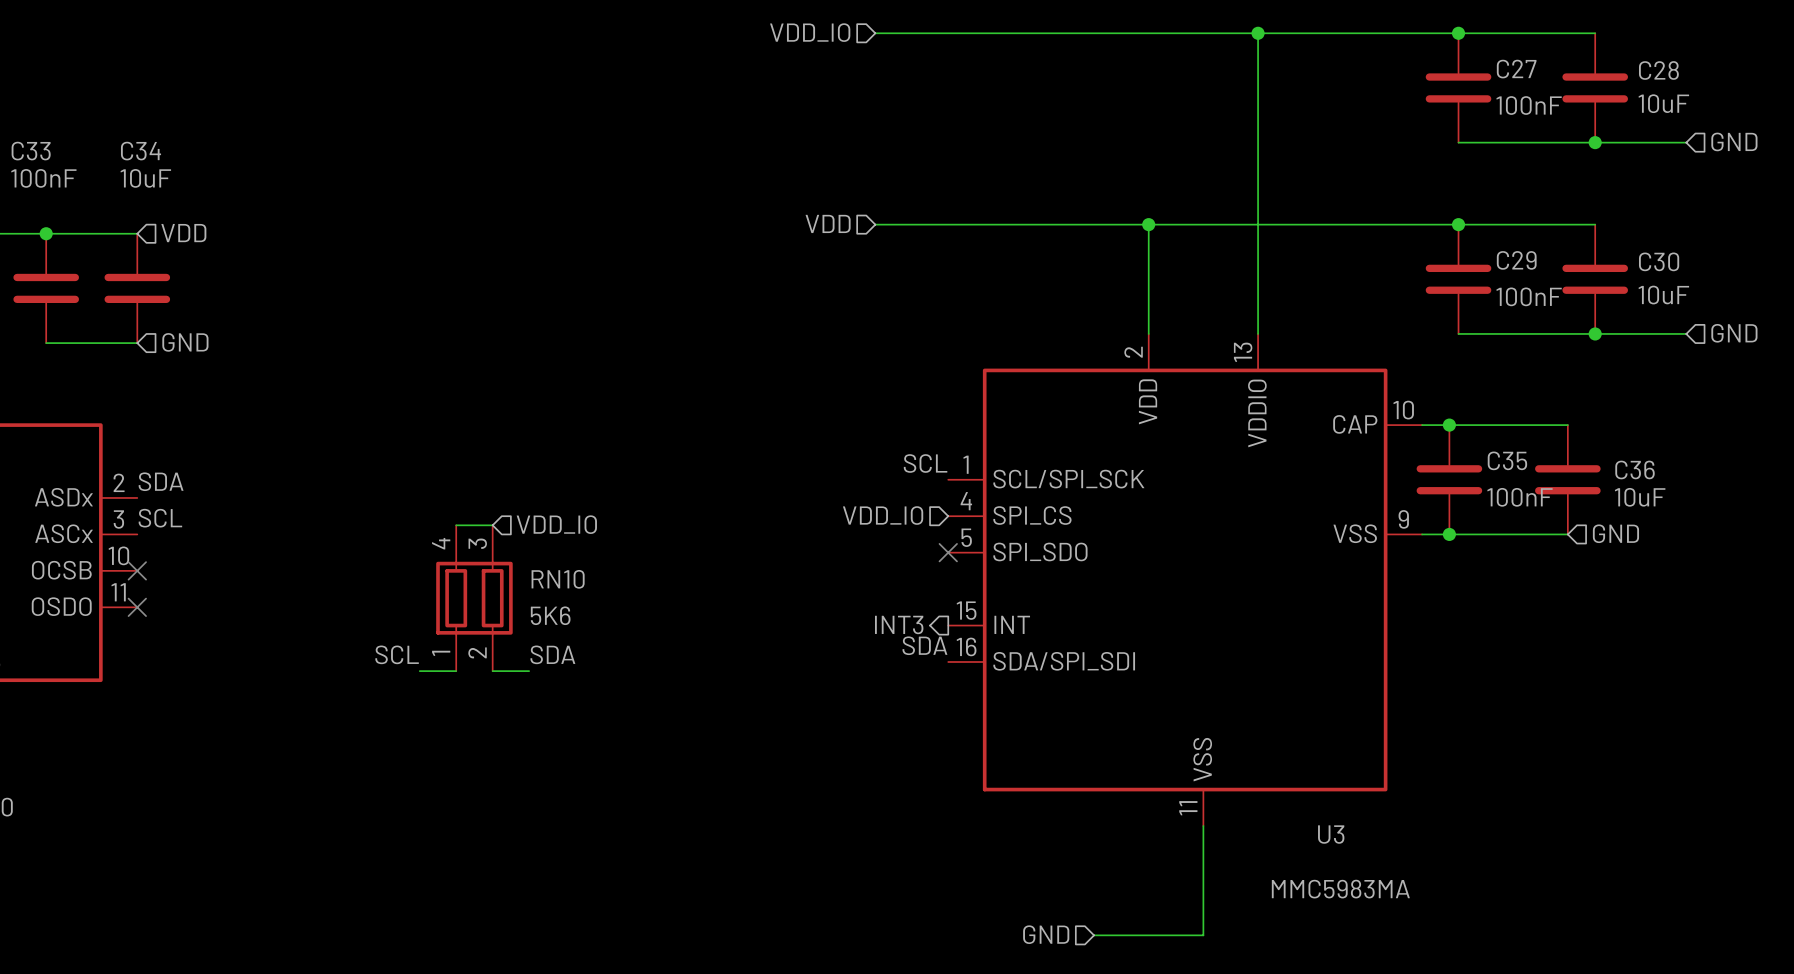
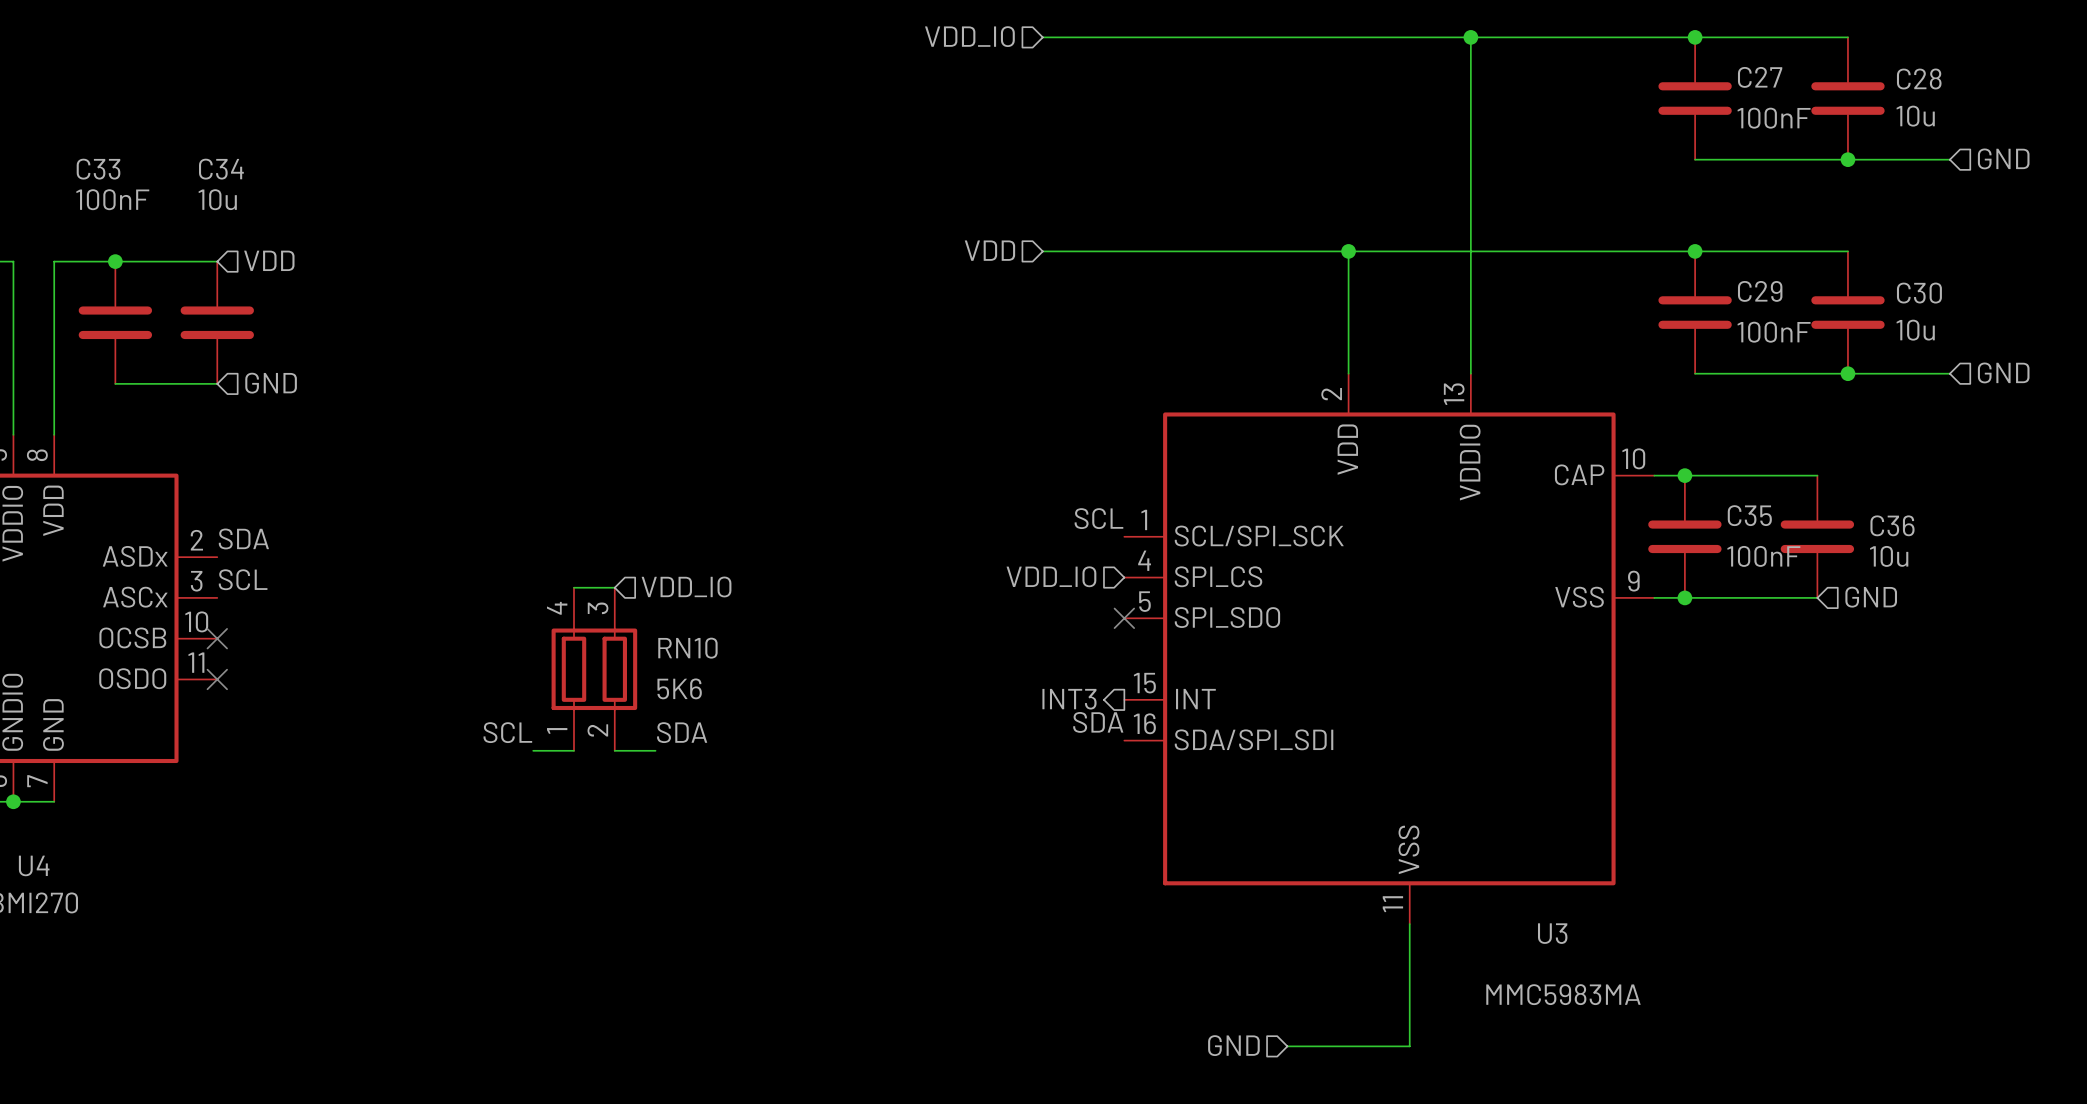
C28 value: 10uF (1663, 103) -> 10u (1915, 116)
C34 value: 10uF (145, 178) -> 10u (217, 199)
C30 value: 10uF (1663, 295) -> 10u (1915, 330)
C36 value: 10uF (1640, 497) -> 10u (1889, 556)

